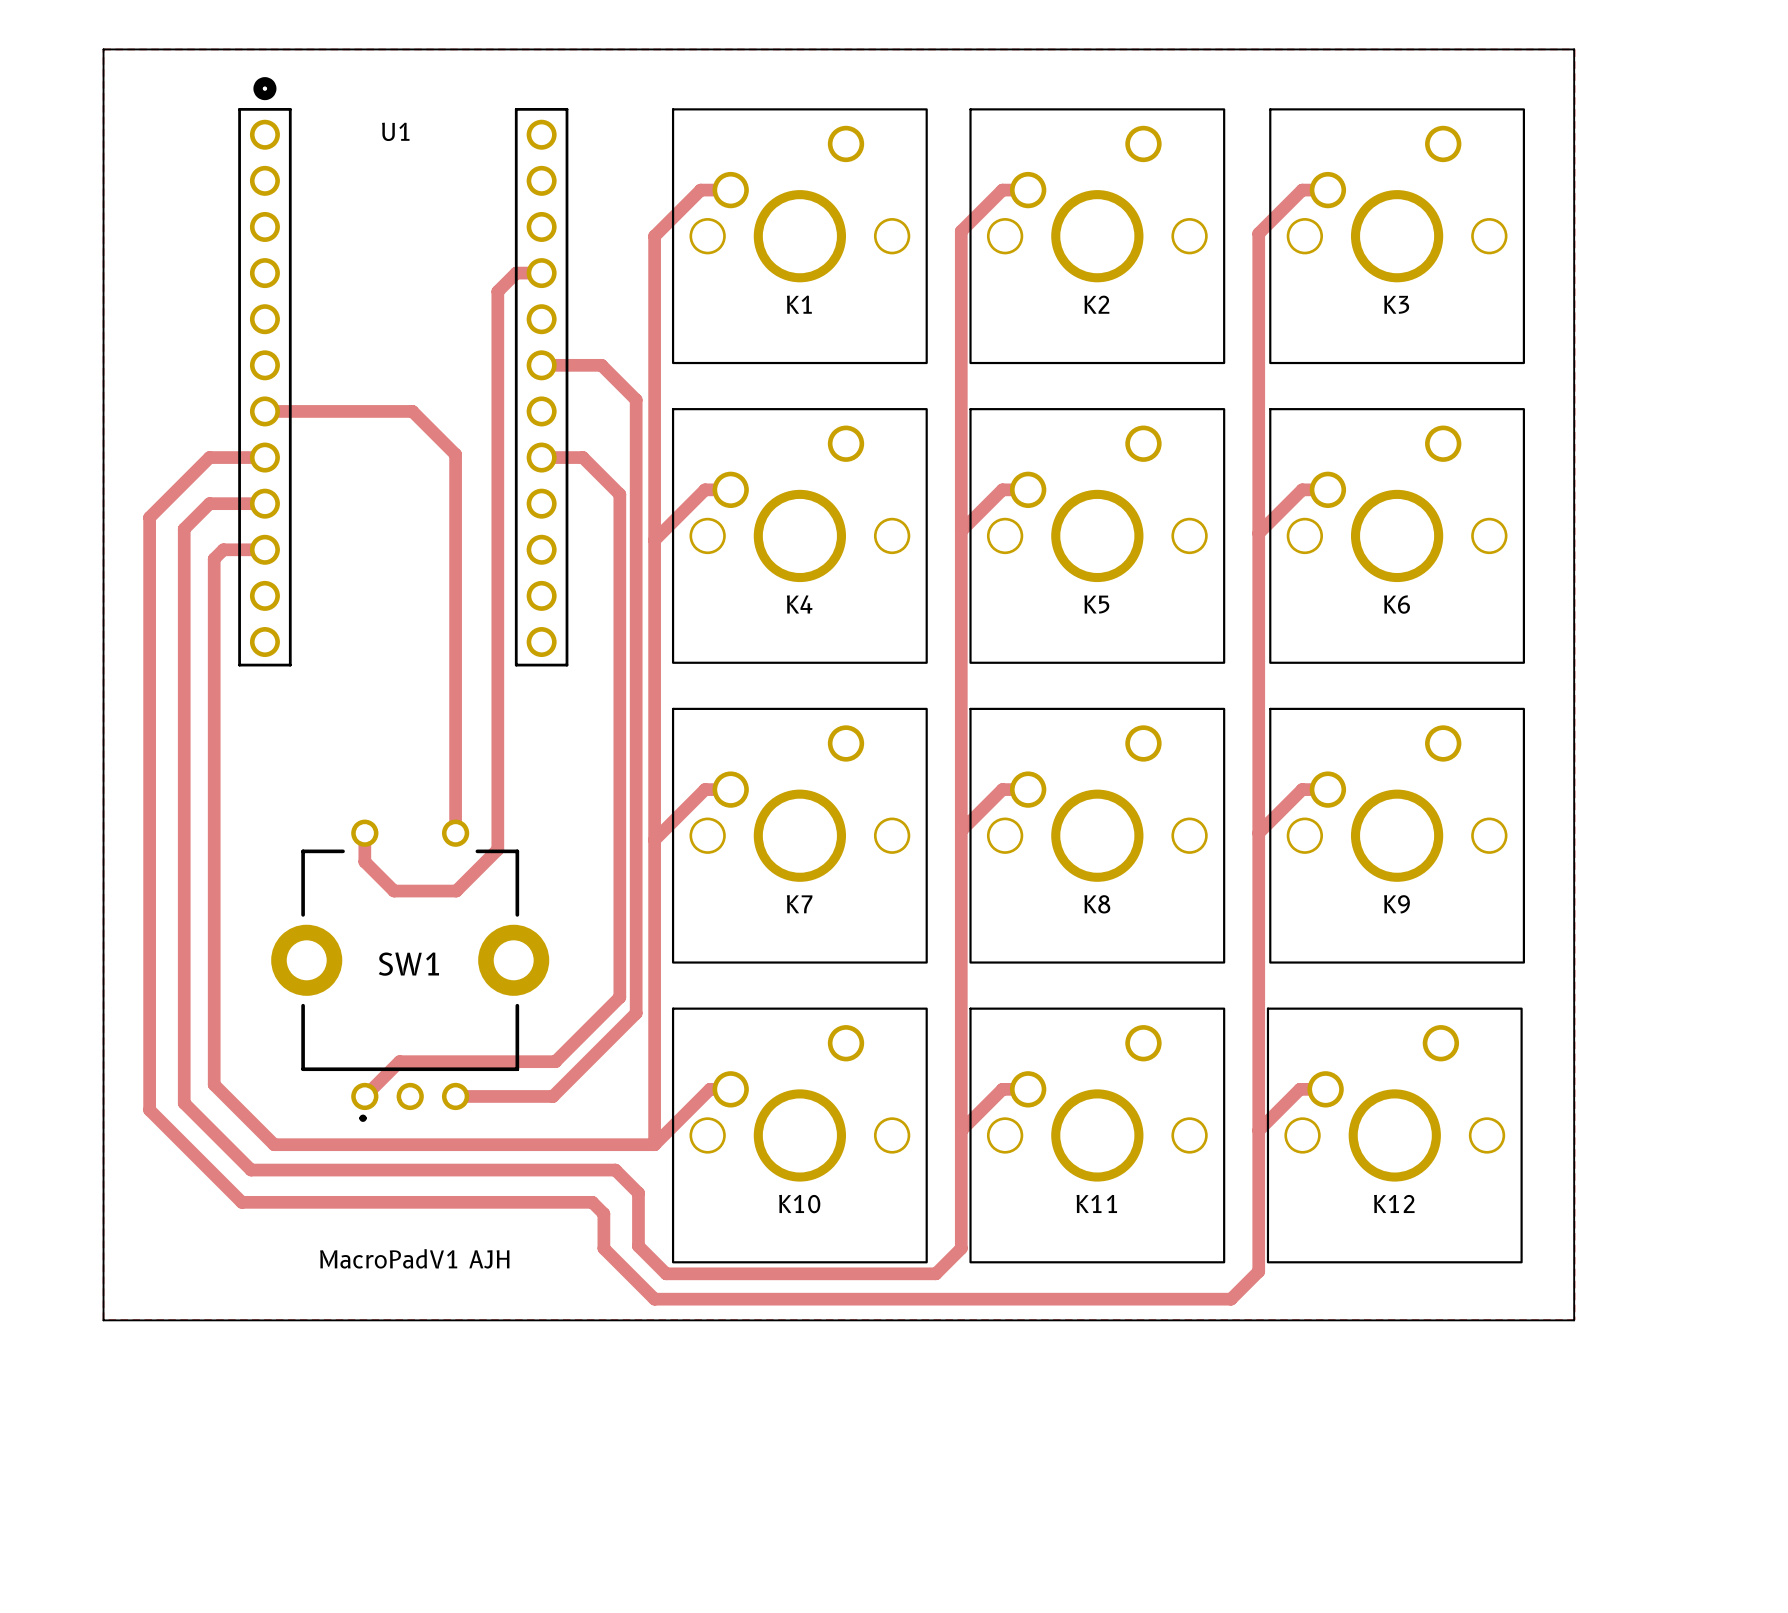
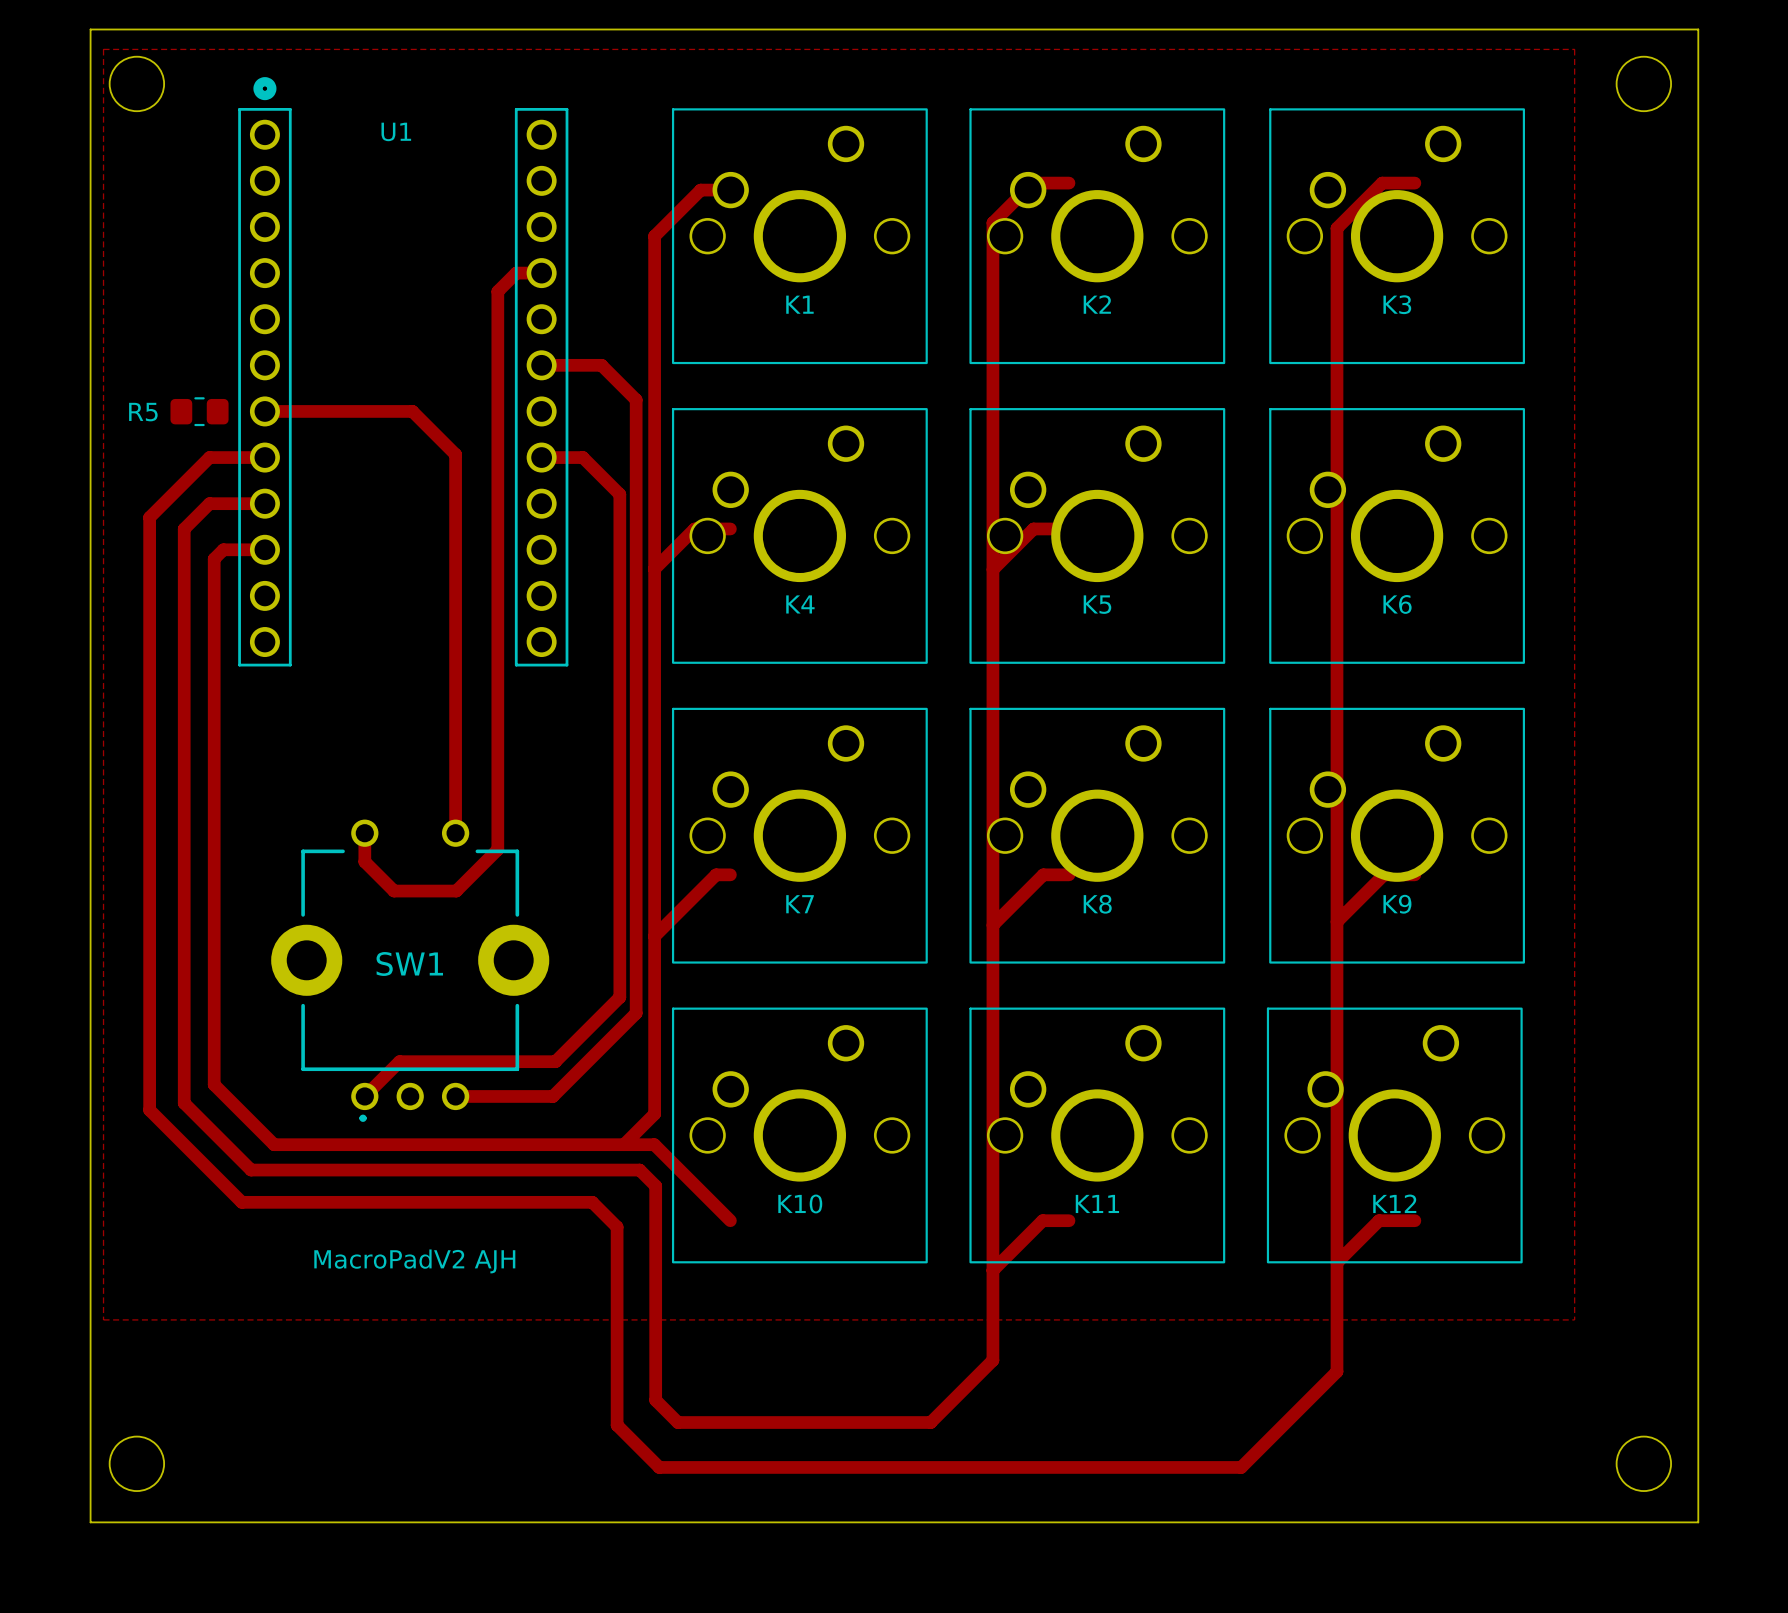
board edge: (103, 49) (1574, 49) (1574, 1320) (103, 1320) (103, 49) -> (90, 29) (90, 1522) (1698, 1522) (1698, 29) (90, 29)
round board edge: none -> [108, 55, 166, 113]
round board edge: none -> [1615, 55, 1672, 113]
track: (1028, 190) (1002, 190) (961, 231) (961, 1248) (935, 1273) (666, 1273) (638, 1246) (638, 1193) (615, 1170) -> (1069, 183) (1032, 183) (992, 222) (992, 1360) (930, 1422) (677, 1422) (655, 1400) (655, 1186) (639, 1170) (615, 1170)
track: (1327, 190) (1302, 190) (1258, 233) (1258, 1271) (1231, 1299) (654, 1299) (603, 1248) (603, 1213) -> (1414, 183) (1382, 183) (1336, 228) (1336, 1371) (1241, 1467) (659, 1467) (617, 1425) (617, 1227) (603, 1213)
R5: none -> (199, 411)
track: (730, 489) (705, 489) (654, 540) -> none
track: (1028, 489) (1002, 489) (961, 531) -> none
track: (1327, 489) (1302, 489) (1258, 533) -> none
track: none -> (730, 528) (694, 528) (654, 569)
track: none -> (1069, 528) (1033, 528) (992, 569)
track: (730, 789) (705, 789) (654, 840) -> (1069, 874) (1043, 874) (992, 925)
track: (1028, 789) (1002, 789) (961, 830) -> none
track: (1327, 789) (1302, 789) (1258, 833) -> none
track: none -> (730, 874) (716, 874) (654, 936)
track: none -> (1414, 874) (1384, 874) (1336, 921)
track: (730, 1089) (709, 1089) (654, 1144) (654, 1114) -> (623, 1144) (654, 1114)
track: (1028, 1089) (1002, 1089) (961, 1130) -> none
track: (1325, 1089) (1299, 1089) (1258, 1130) -> none
track: none -> (654, 1144) (730, 1220)
track: none -> (1069, 1220) (1042, 1220) (992, 1270)
track: none -> (1414, 1220) (1379, 1220) (1336, 1262)
text: MacroPadV1 AJH (414, 1258) -> MacroPadV2 AJH (414, 1261)
round board edge: none -> [108, 1435, 166, 1492]
round board edge: none -> [1615, 1435, 1672, 1492]

